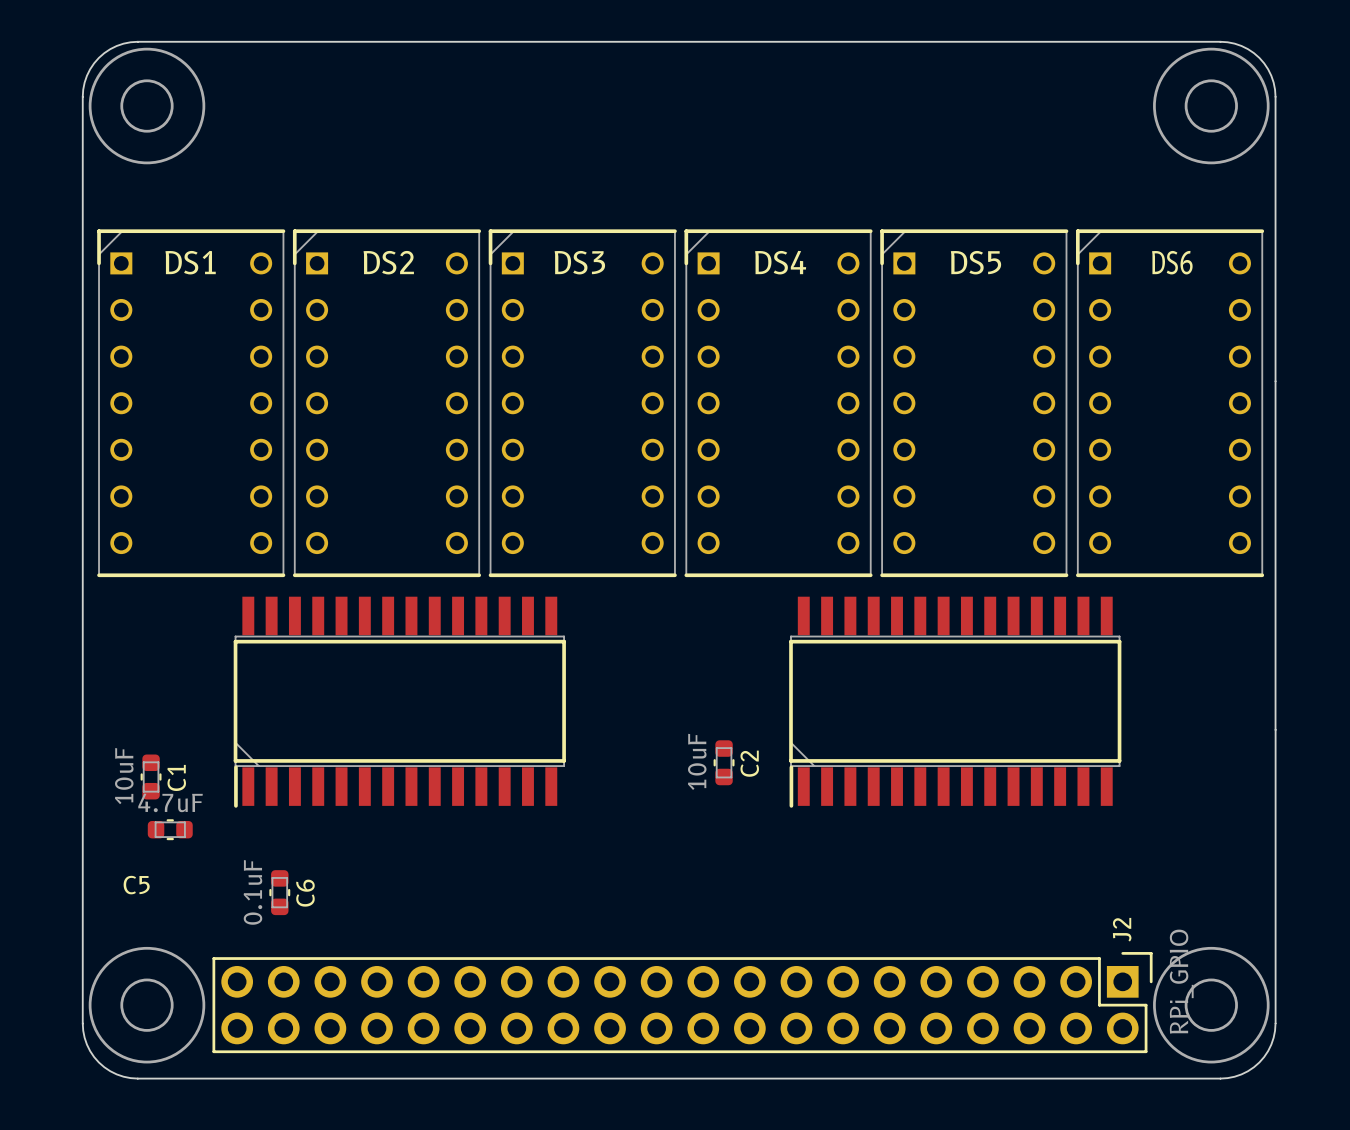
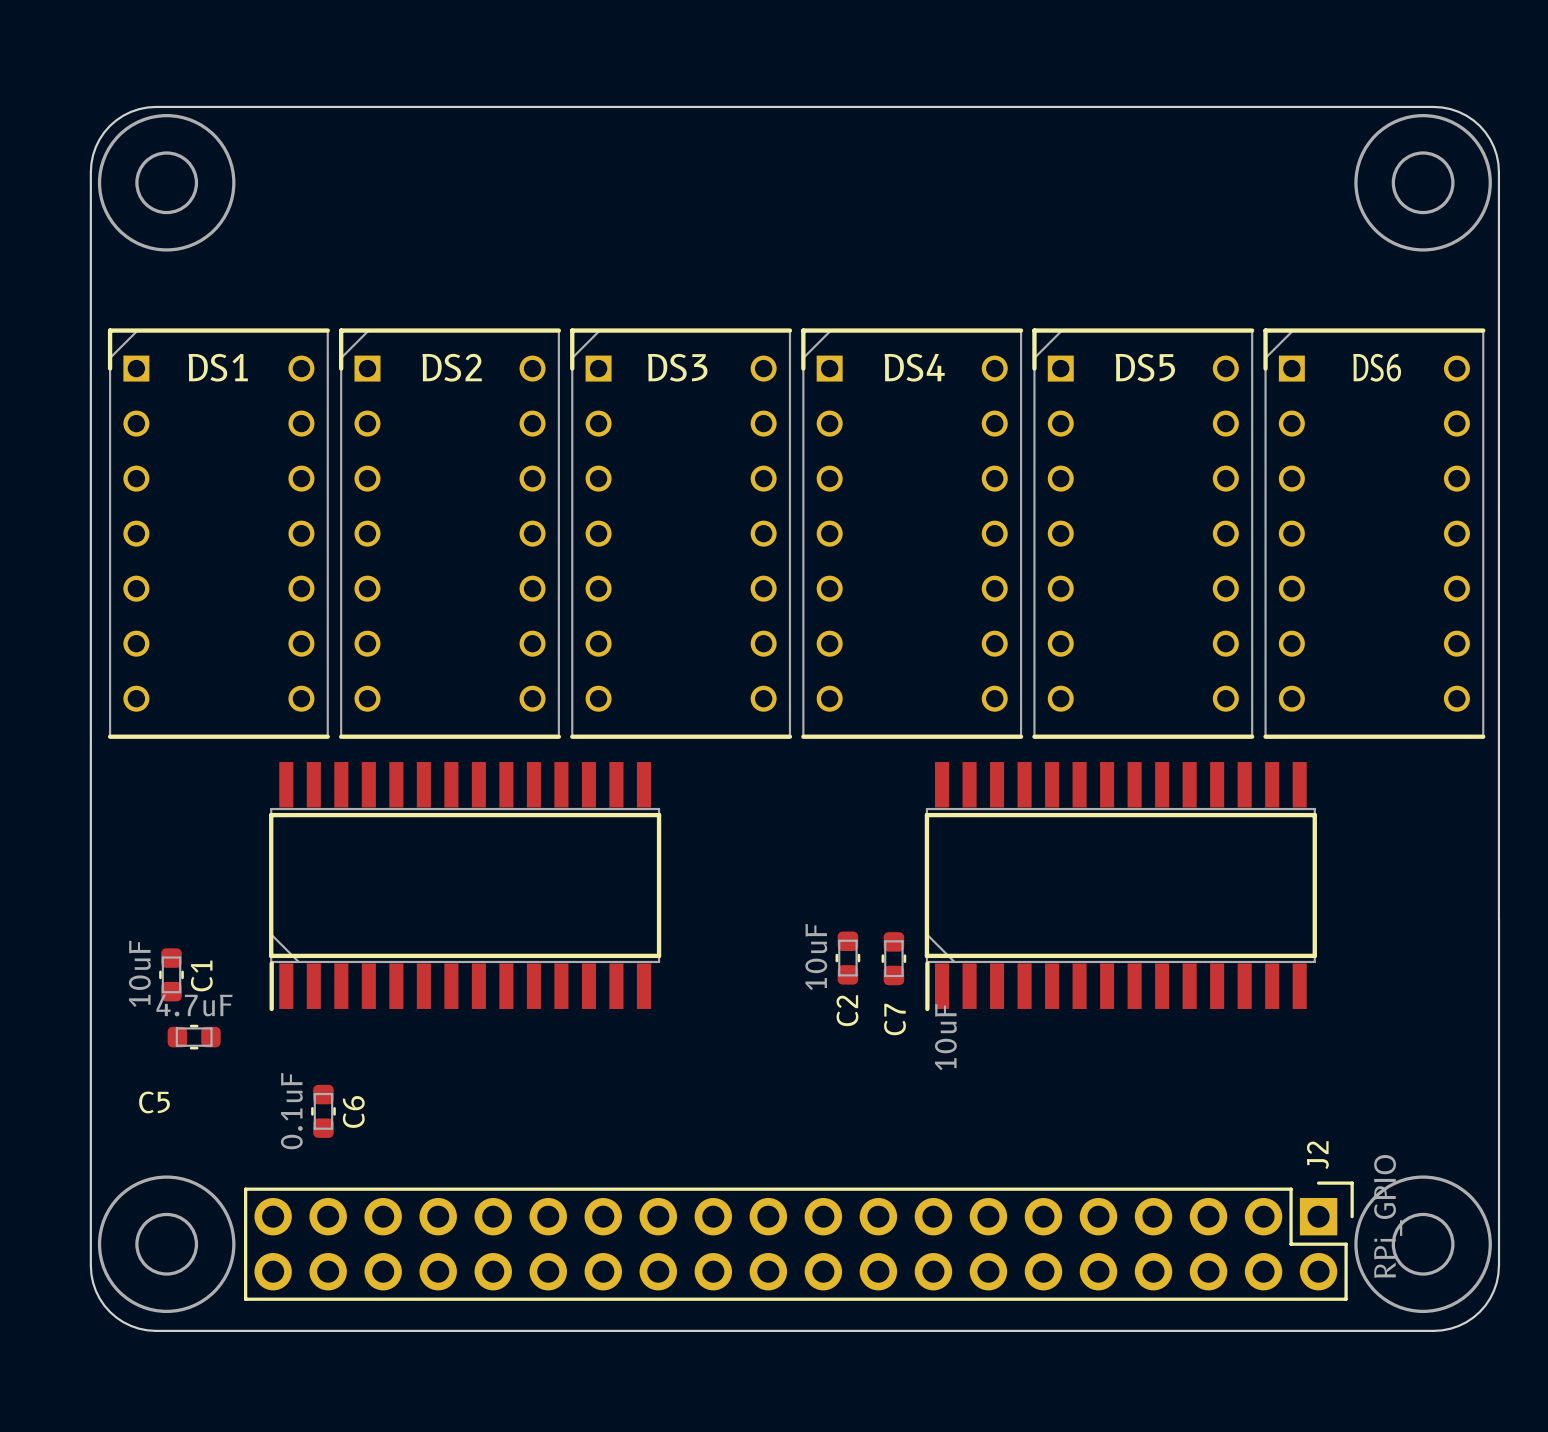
C2 name position: C2 (749, 763) -> C2 (847, 1010)
C7: none -> 10uF (893, 958)

